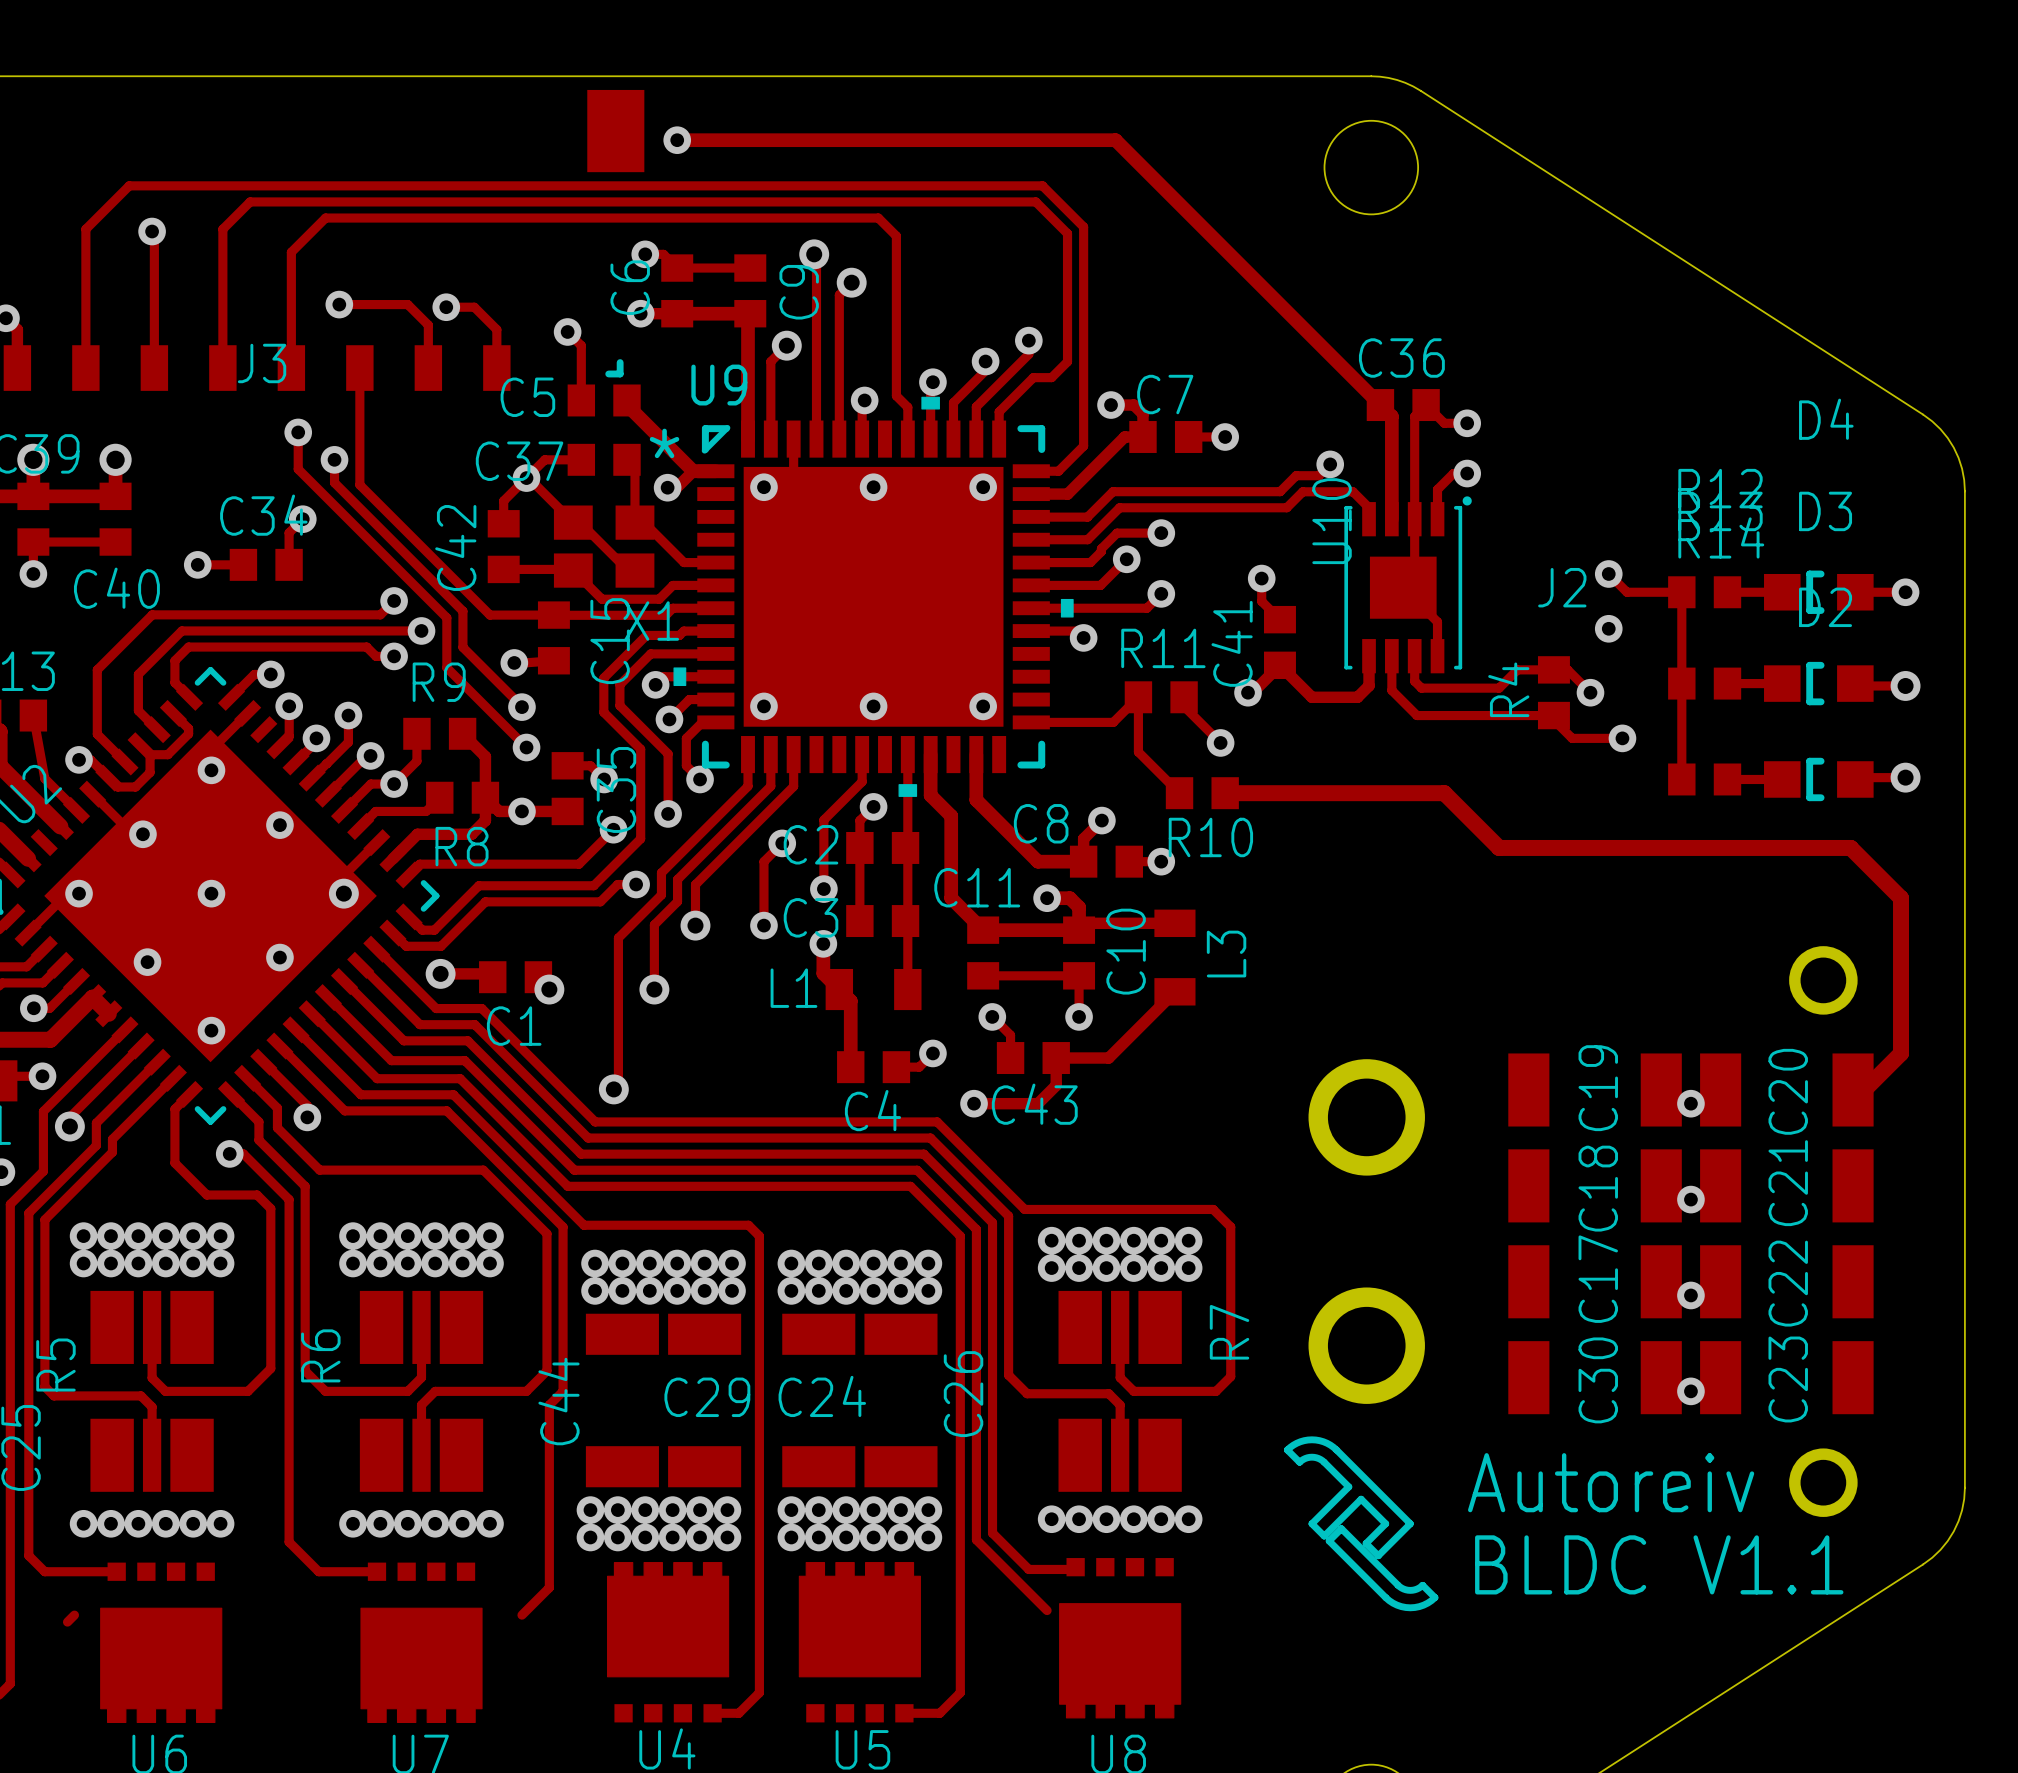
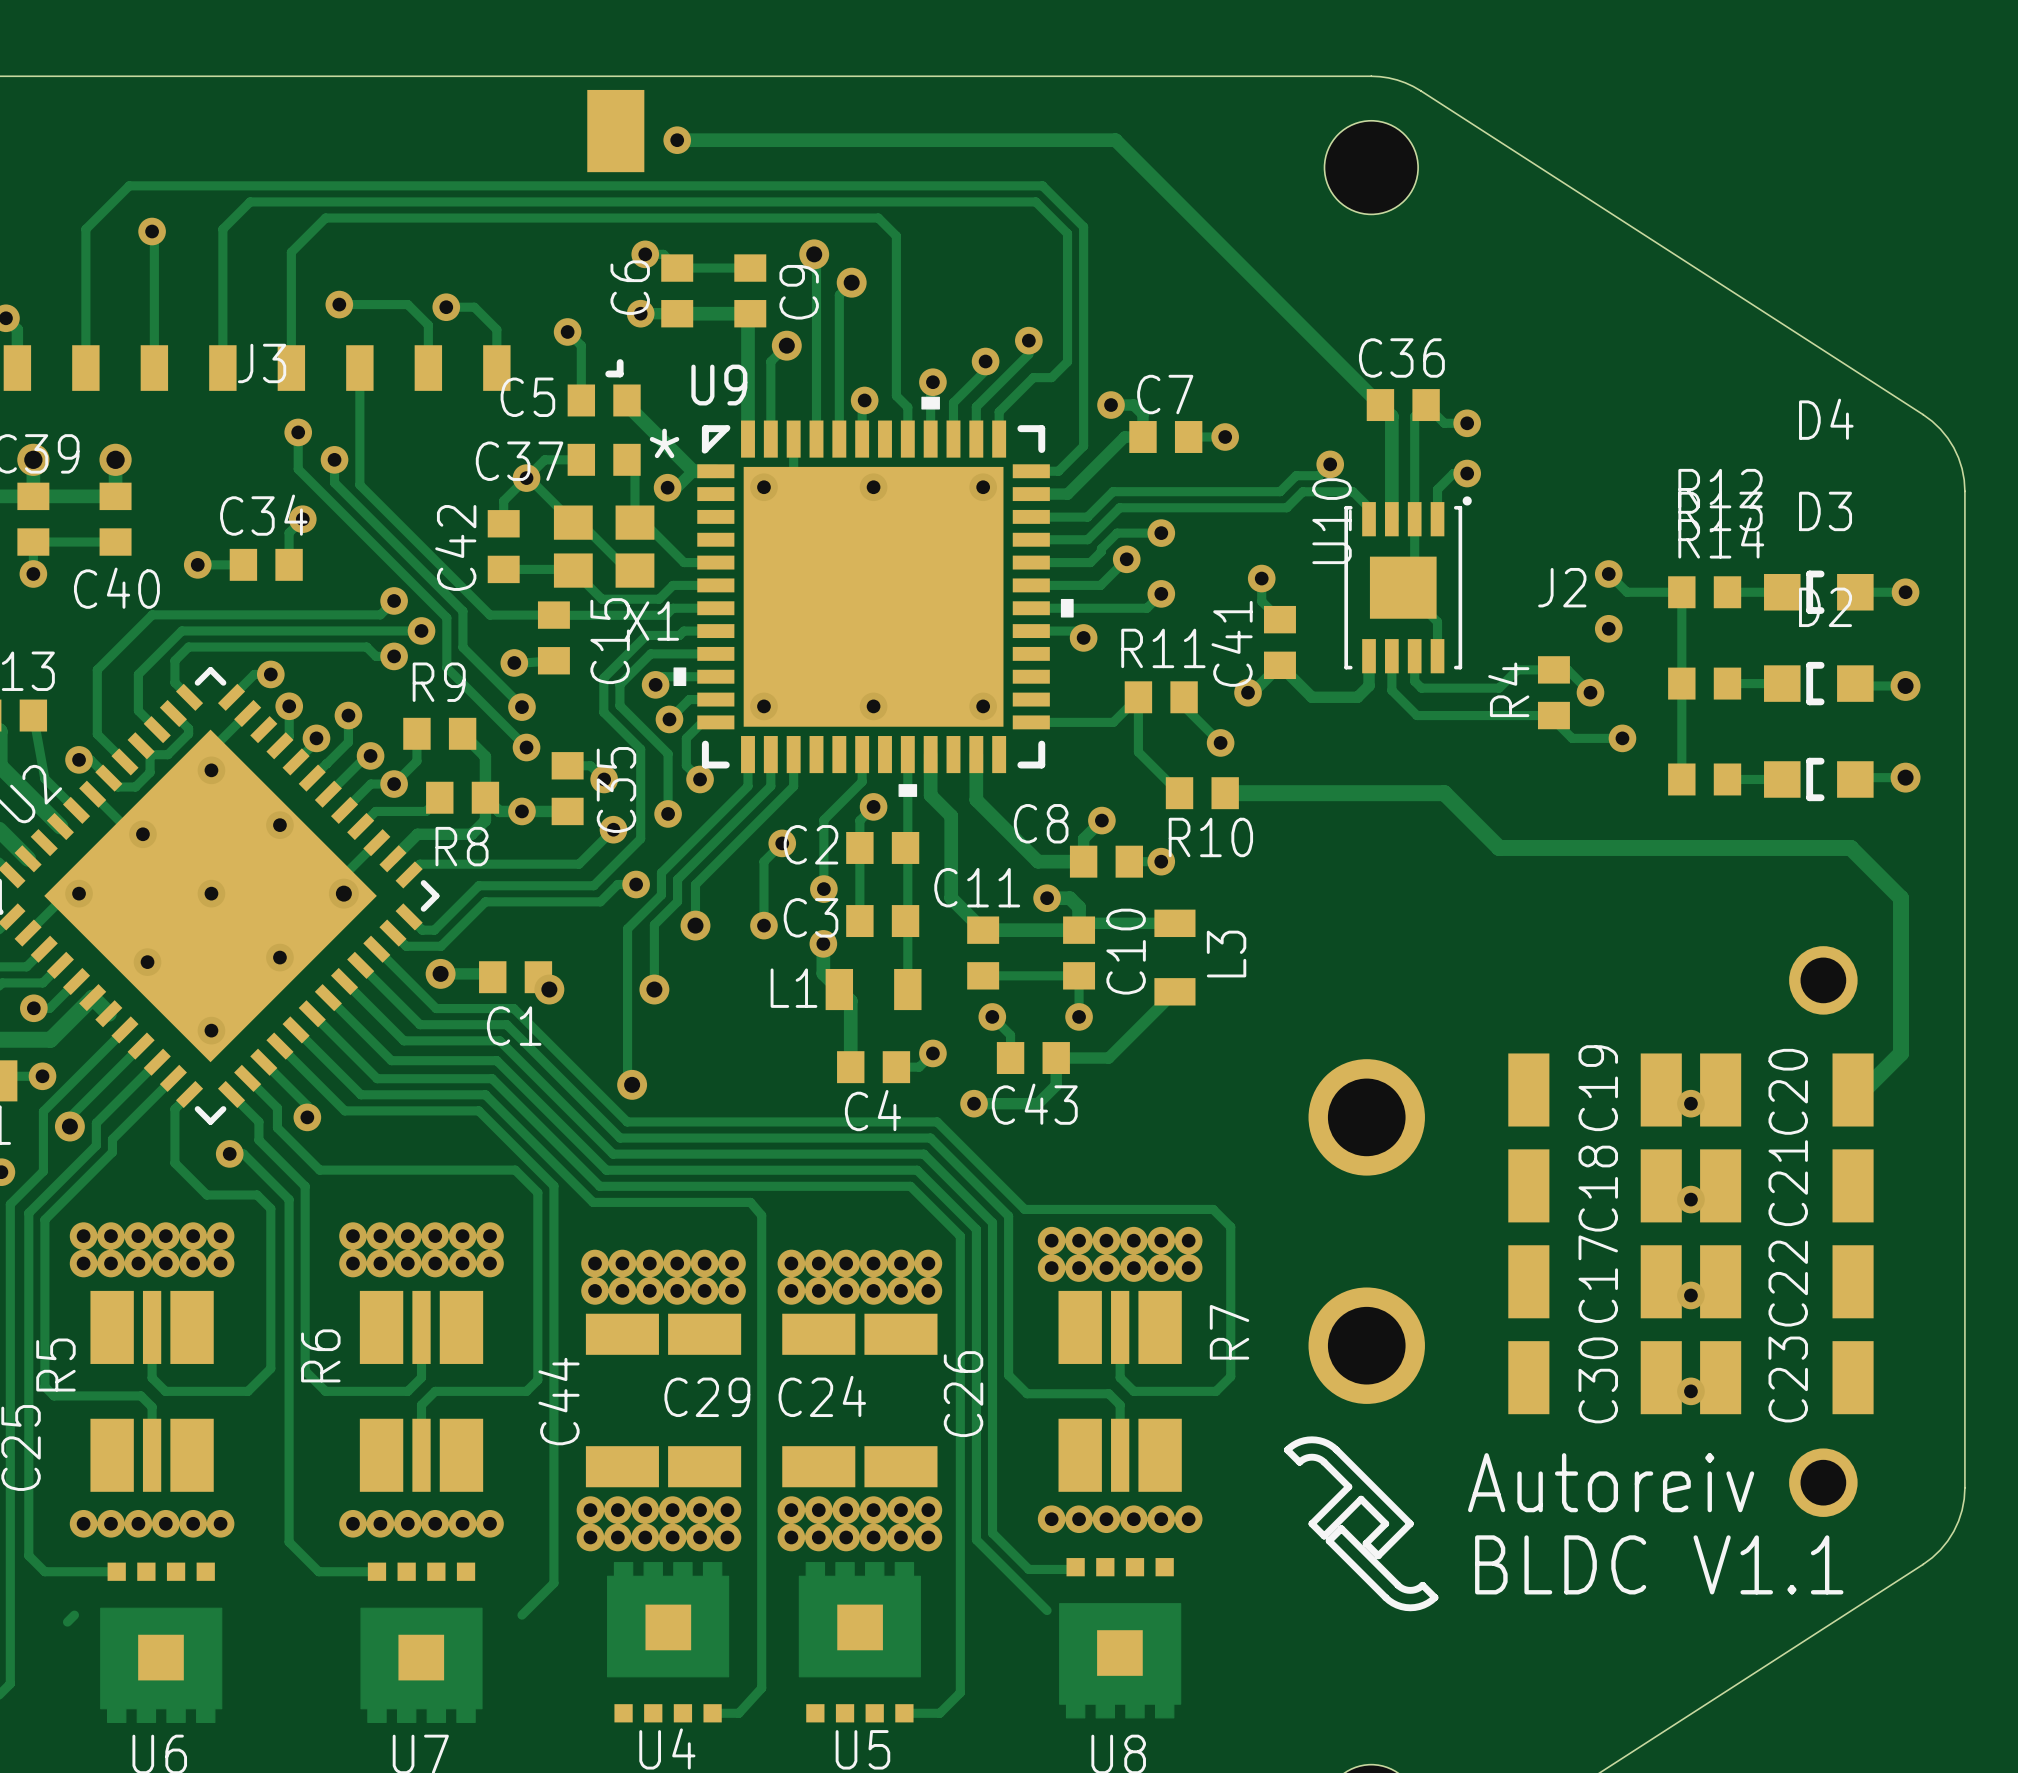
track: (627, 928) (618, 938) (618, 1084) (613, 1089) -> (627, 928) (627, 1080) (632, 1084)
track: (481, 1008) (595, 1121) (627, 1121) -> (481, 1008) (513, 1008) (627, 1121)
track: (474, 1024) (588, 1138) (620, 1138) -> (474, 1024) (506, 1024) (620, 1138)
track: (467, 1040) (581, 1154) (613, 1154) -> (467, 1040) (499, 1040) (613, 1154)
track: (464, 1060) (574, 1170) (606, 1170) -> (464, 1060) (496, 1060) (606, 1170)
track: (460, 1078) (567, 1186) (599, 1186) -> (460, 1078) (492, 1078) (599, 1186)
via position: (613, 1089) -> (632, 1084)
track: (453, 1094) (583, 1225) (748, 1225) (759, 1236) (759, 1692) (738, 1713) -> (453, 1094) (485, 1094) (593, 1202) (750, 1202) (761, 1215) (761, 1688) (738, 1713)
track: (446, 1110) (563, 1227) (563, 1391) (549, 1405) (549, 1587) -> (446, 1110) (478, 1110) (553, 1186) (553, 1583) (549, 1587)
track: (483, 1170) (546, 1233) (546, 1370) (537, 1380) -> (483, 1170) (515, 1170) (537, 1192) (537, 1380)

